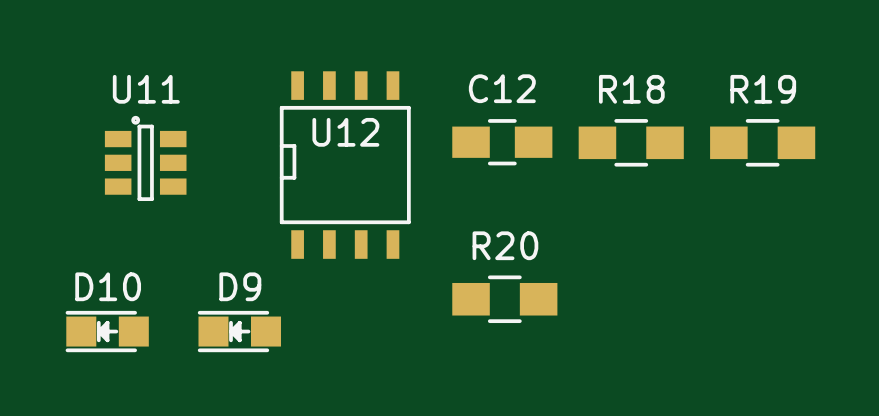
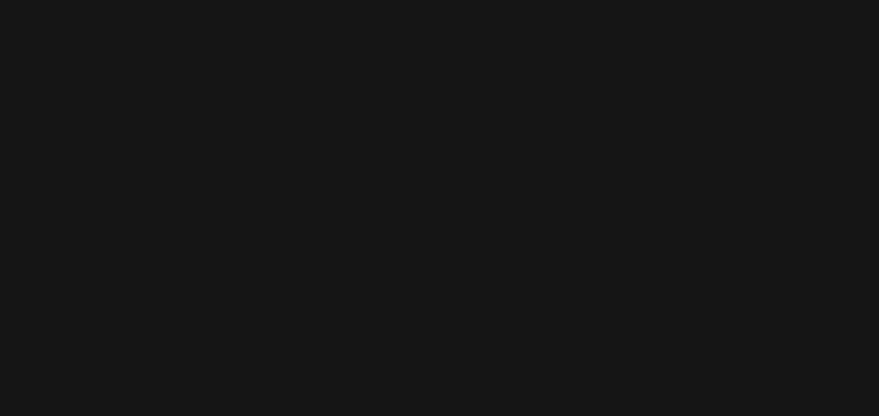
C12: (502, 142) -> none
R18: (631, 142) -> none
R19: (762, 142) -> none
U11: (145, 158) -> none
U12: (345, 165) -> none
R20: (504, 299) -> none
D10: (107, 331) -> none
D9: (239, 331) -> none

